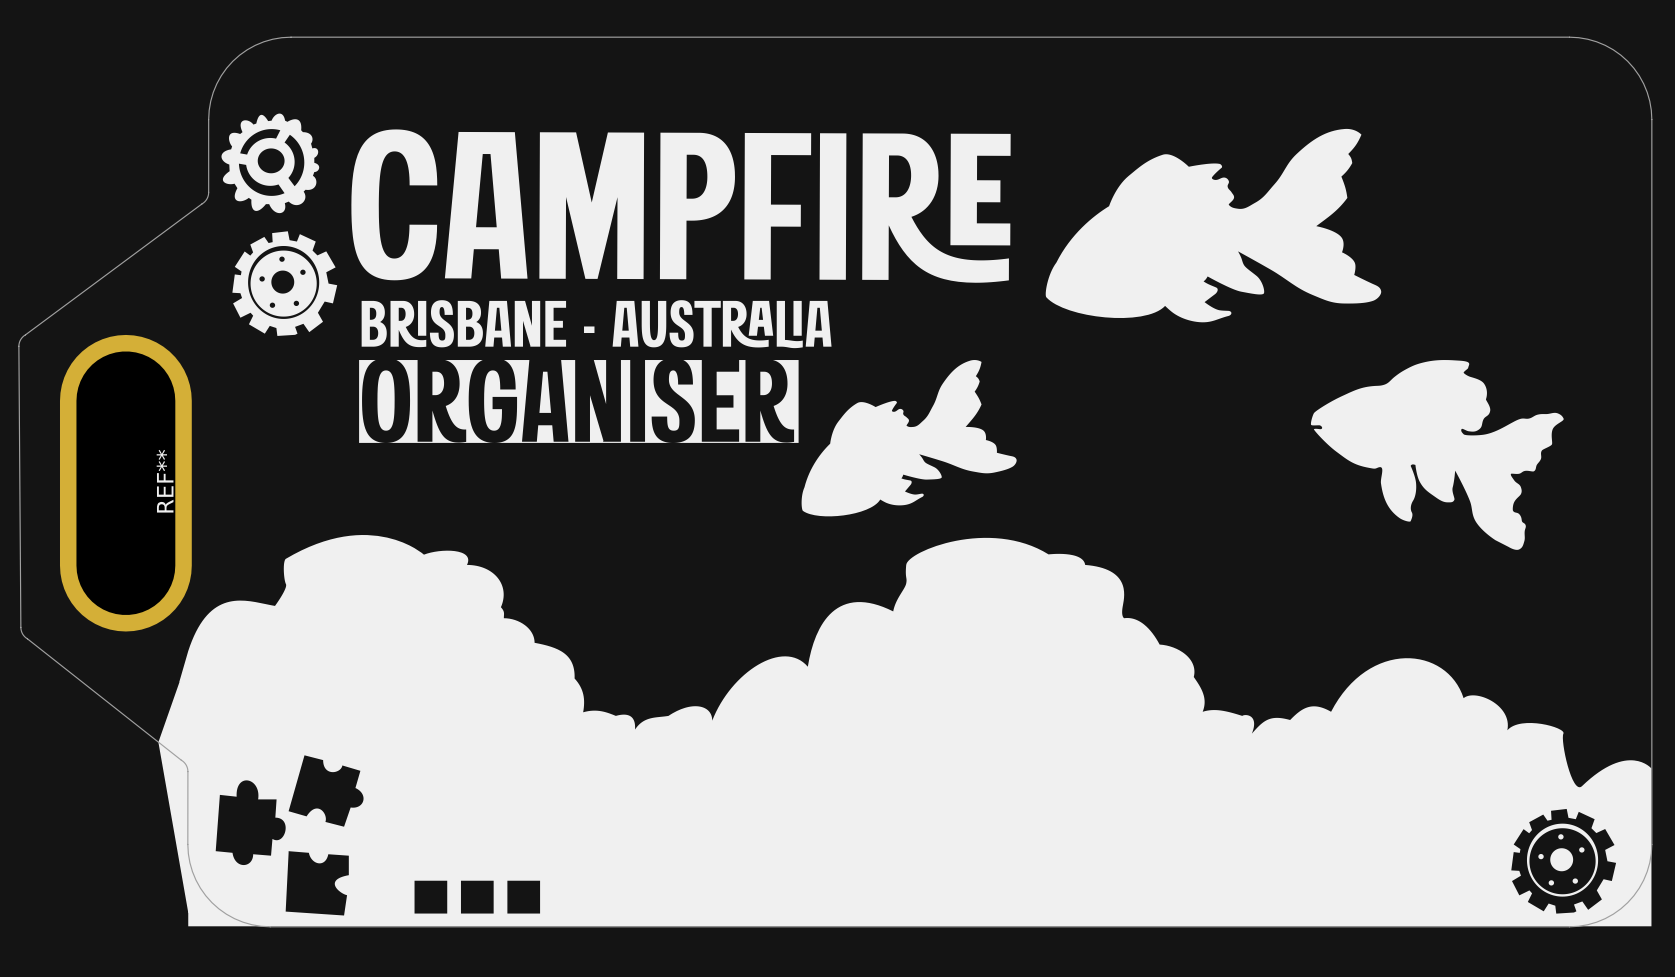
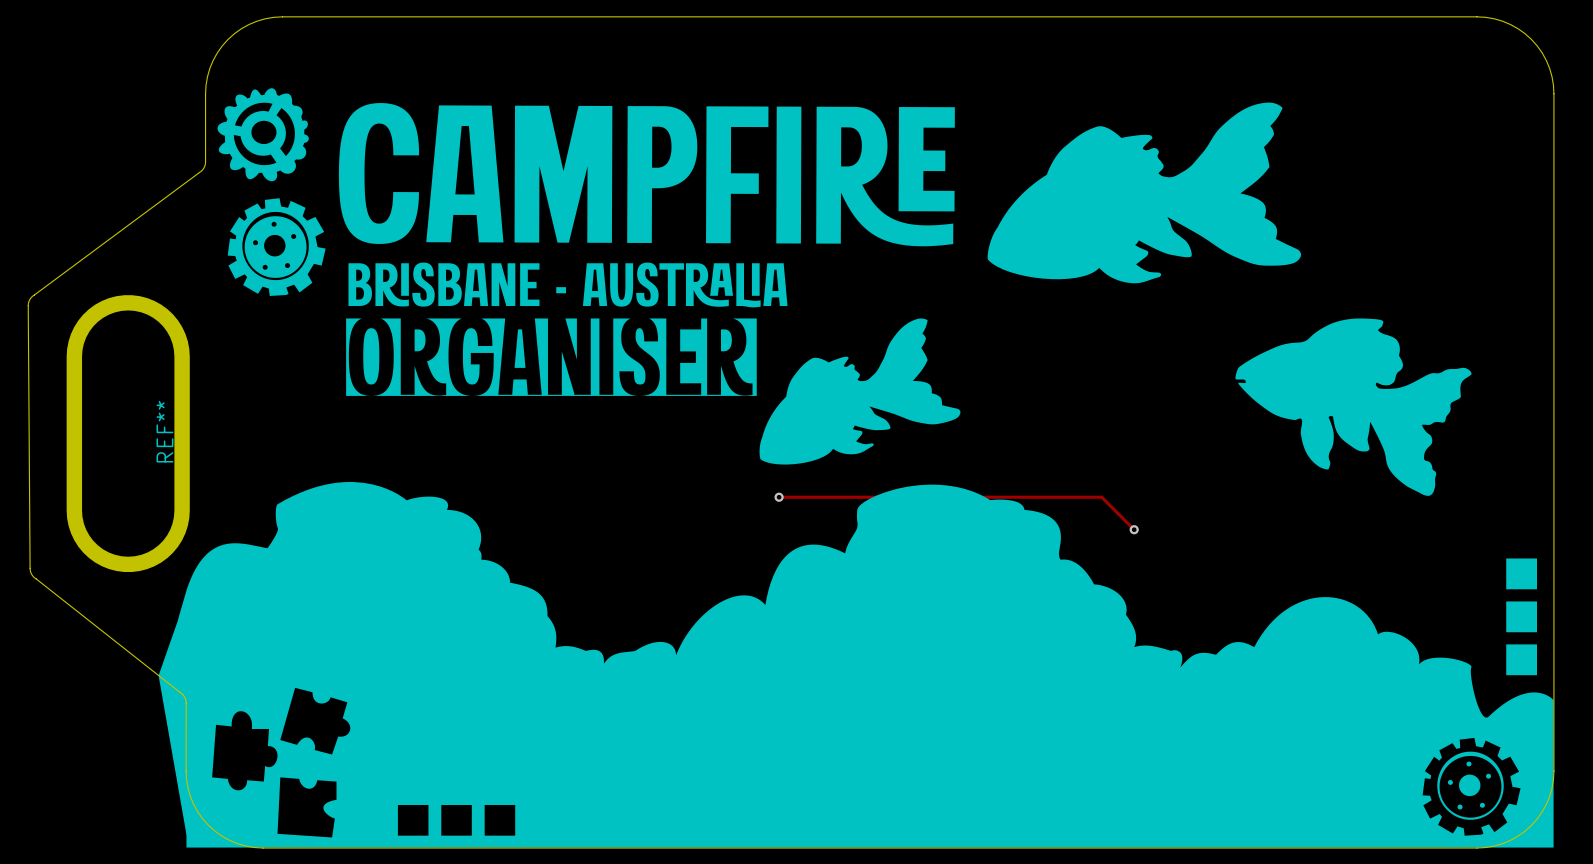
track: none -> (779, 497) (1101, 497) (1134, 529)
via: none -> (779, 497)
via: none -> (1134, 529)
drawing: none -> [1506, 558, 1538, 676]

